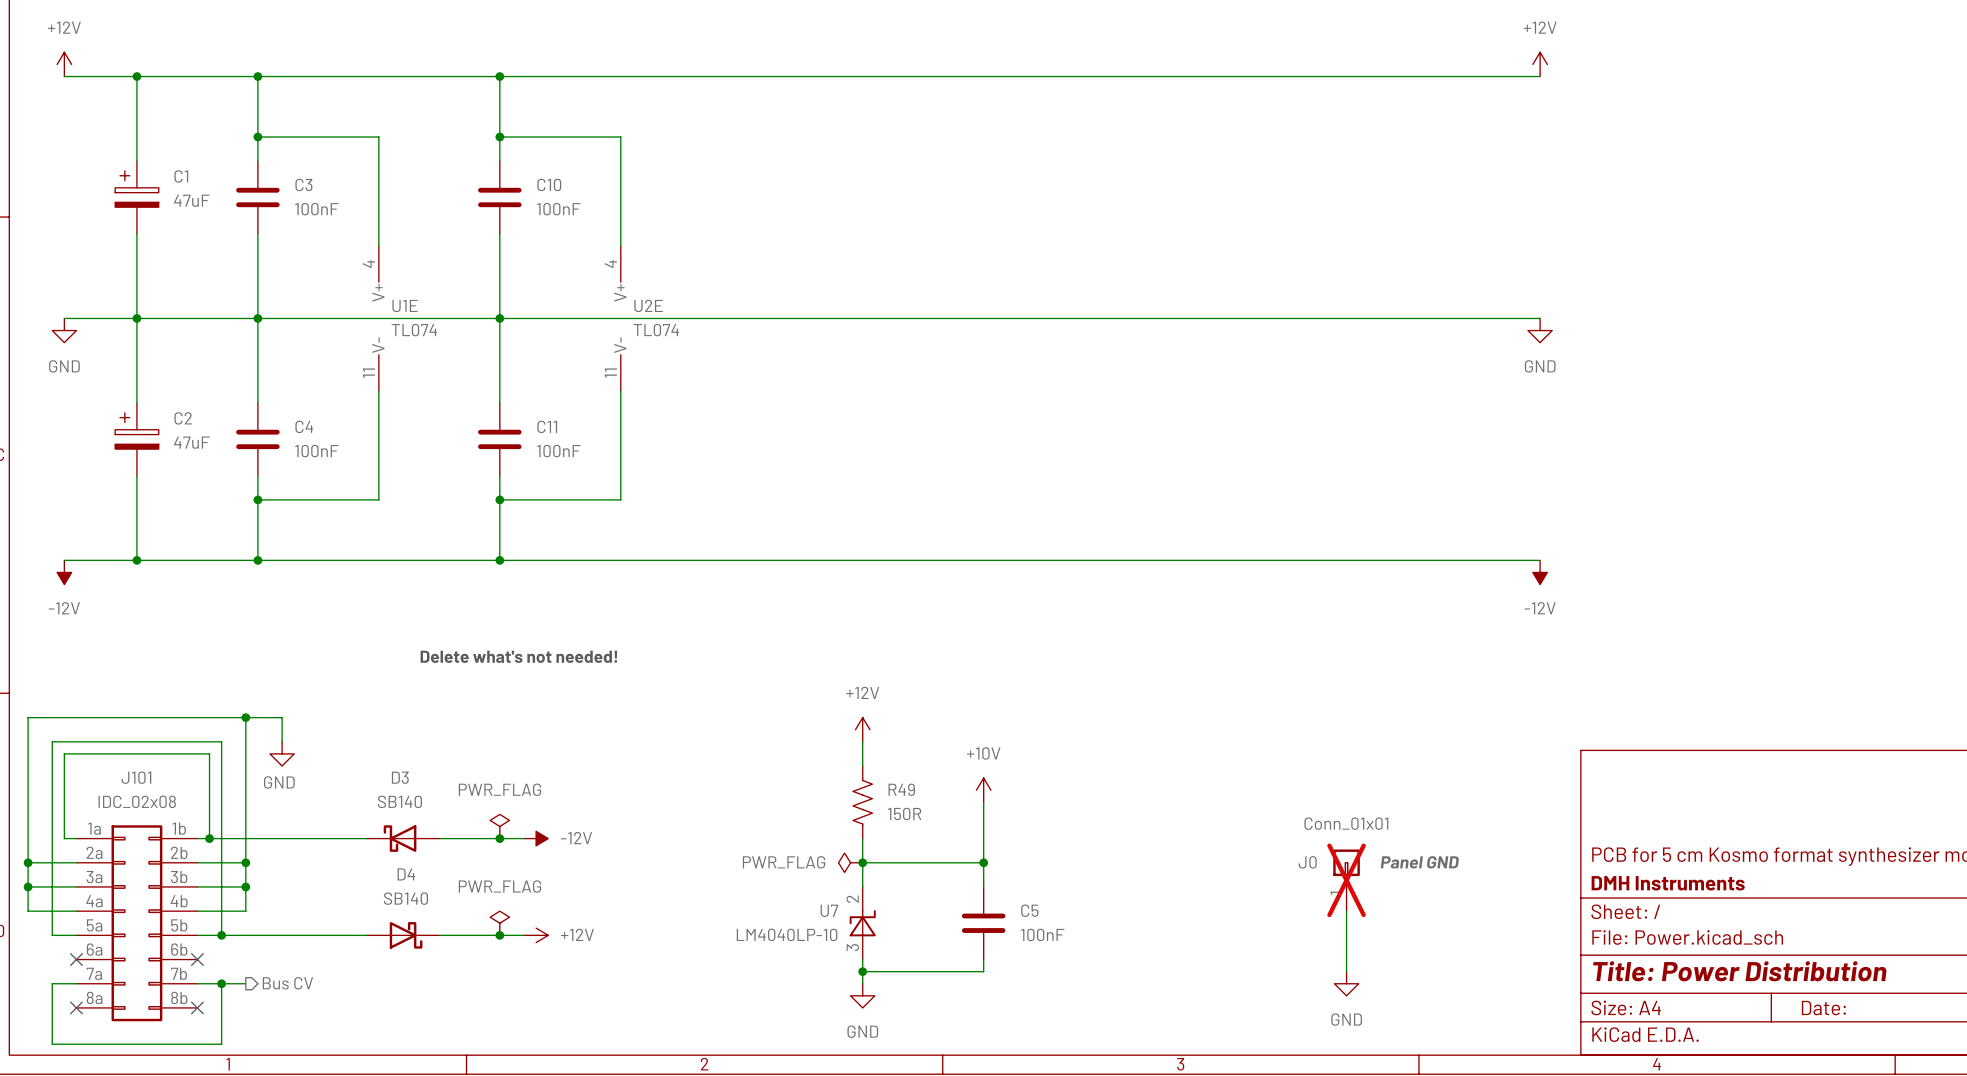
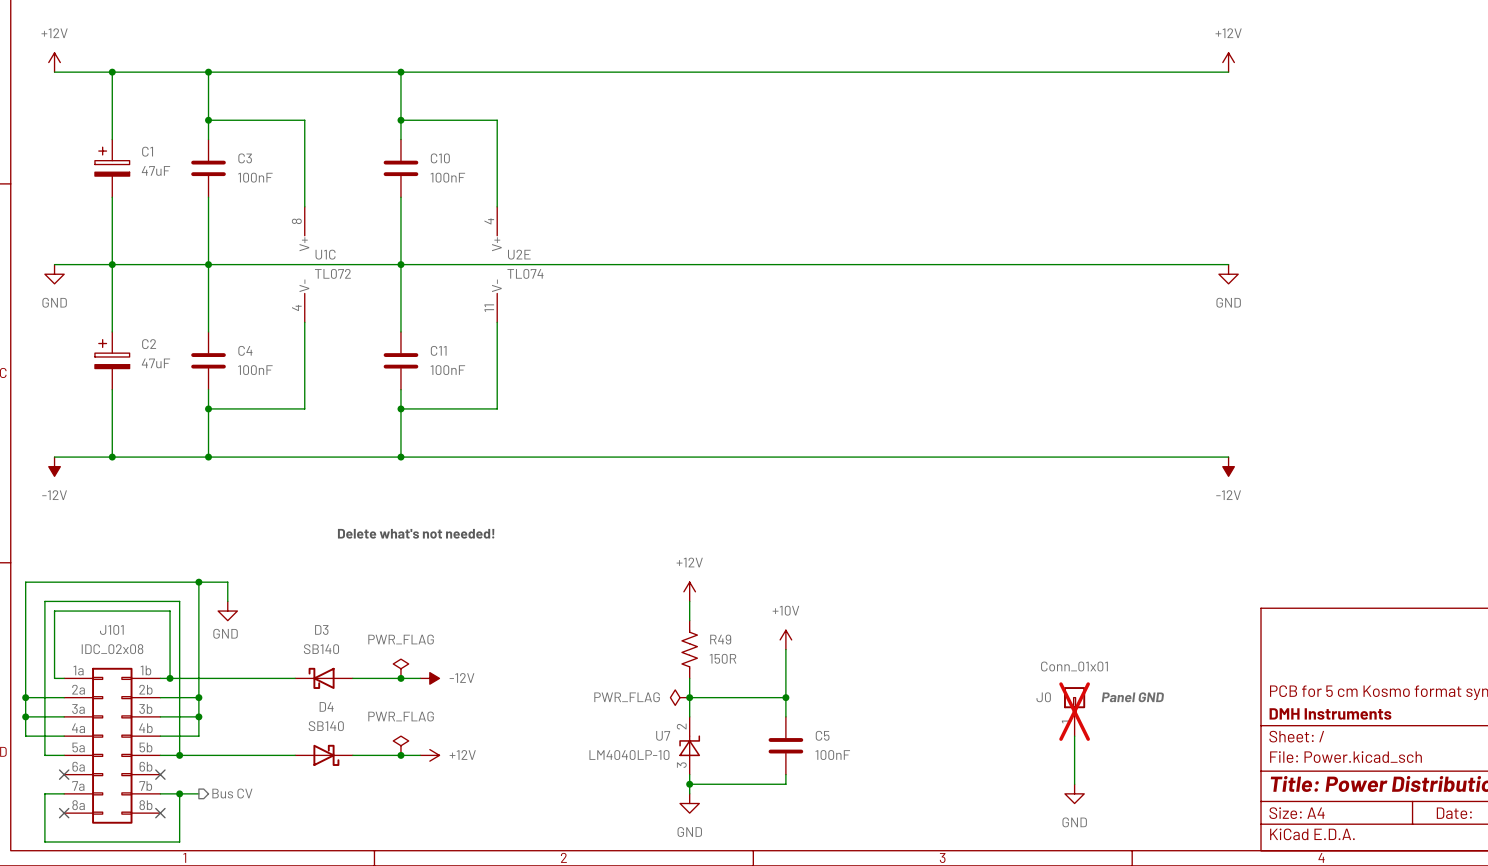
U1E pin number: 4 (368, 264) -> 8 (296, 221)
U1E name: U1E (405, 305) -> U1C (325, 254)
U1E value: TL074 (414, 330) -> TL072 (332, 273)
U1E pin number: 11 (368, 373) -> 4 (296, 307)

